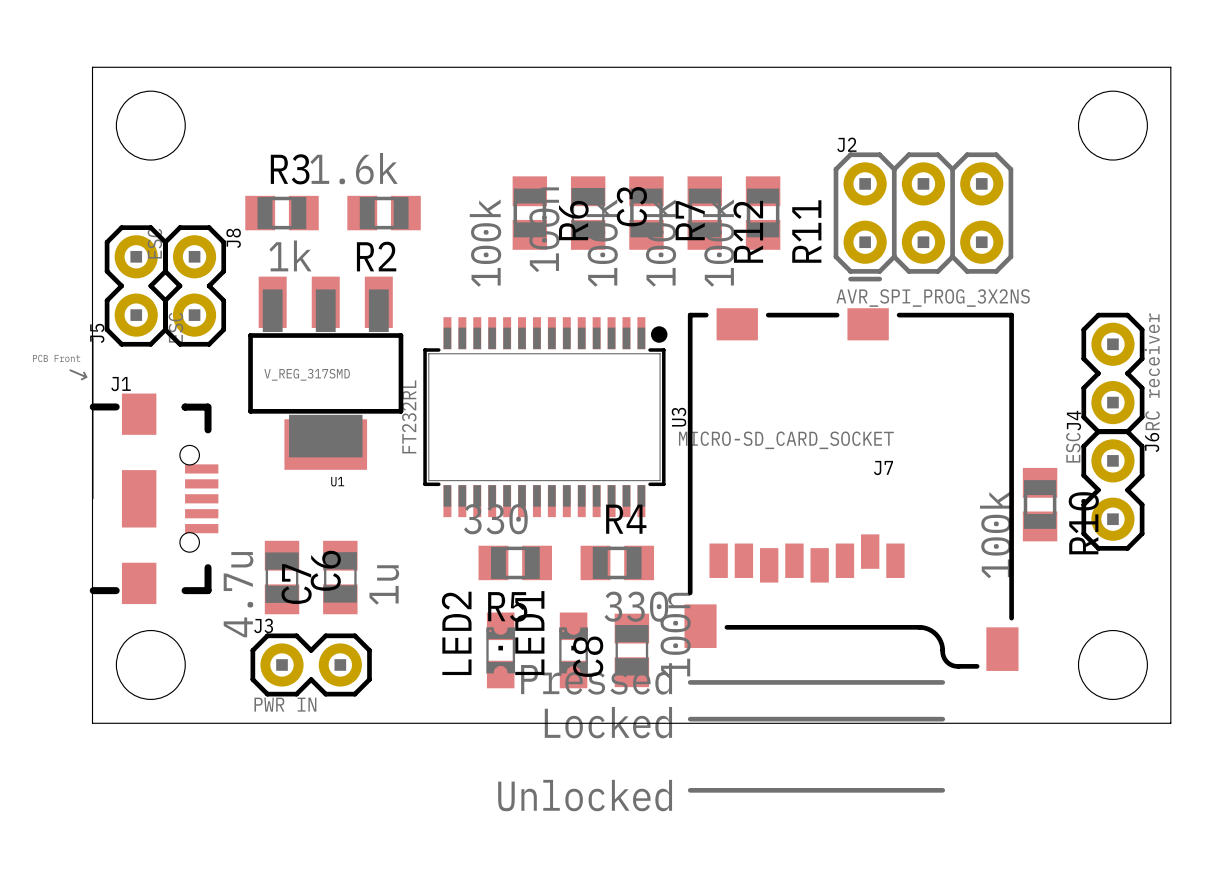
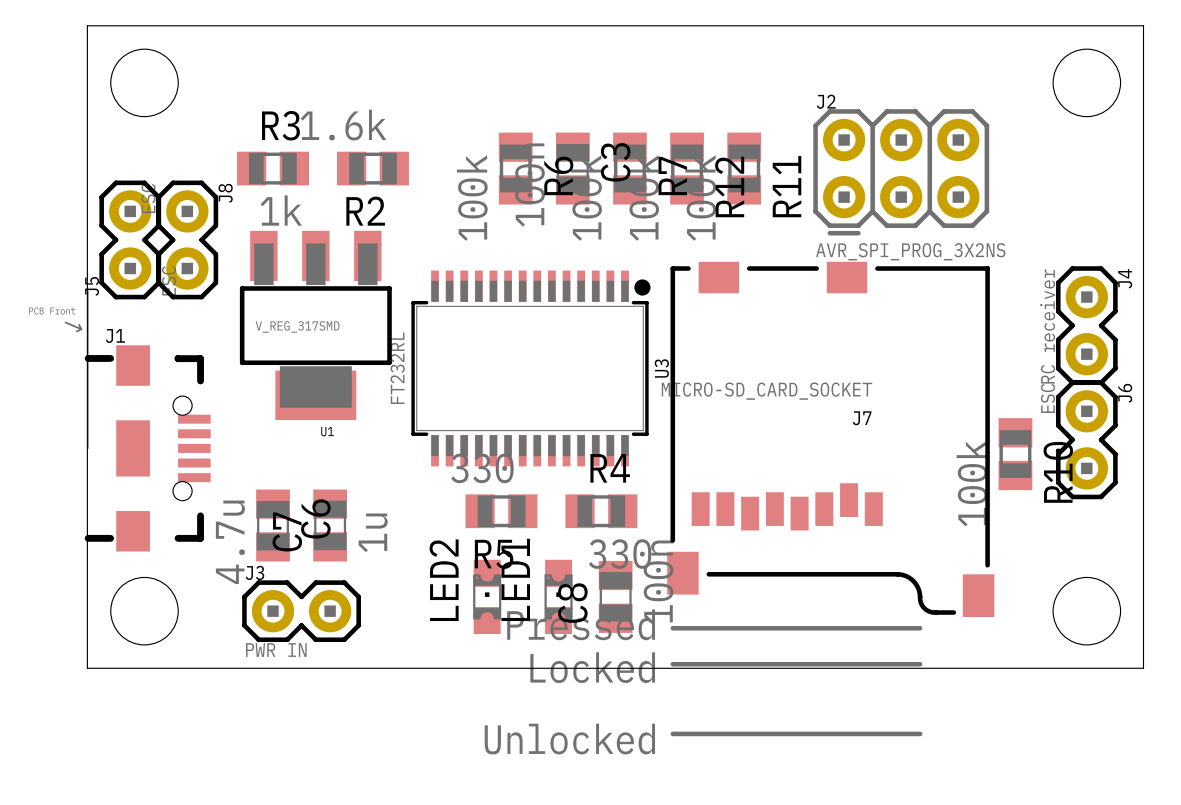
J4 value position: RC receiver (1152, 371) -> RC receiver (1047, 326)
J4 name position: J4 (1074, 420) -> J4 (1125, 278)

